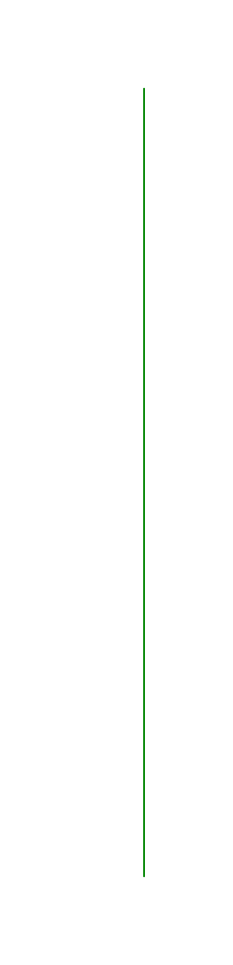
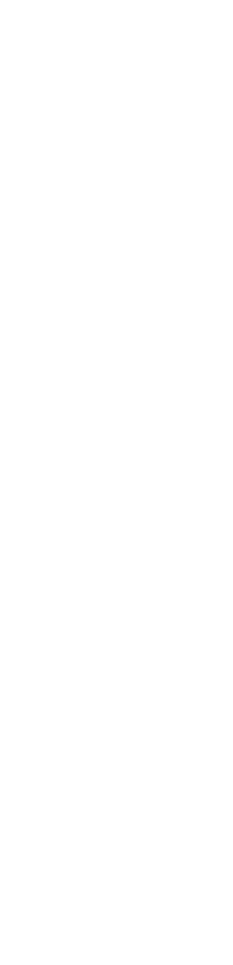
wire: (144, 88) (144, 876) -> none

